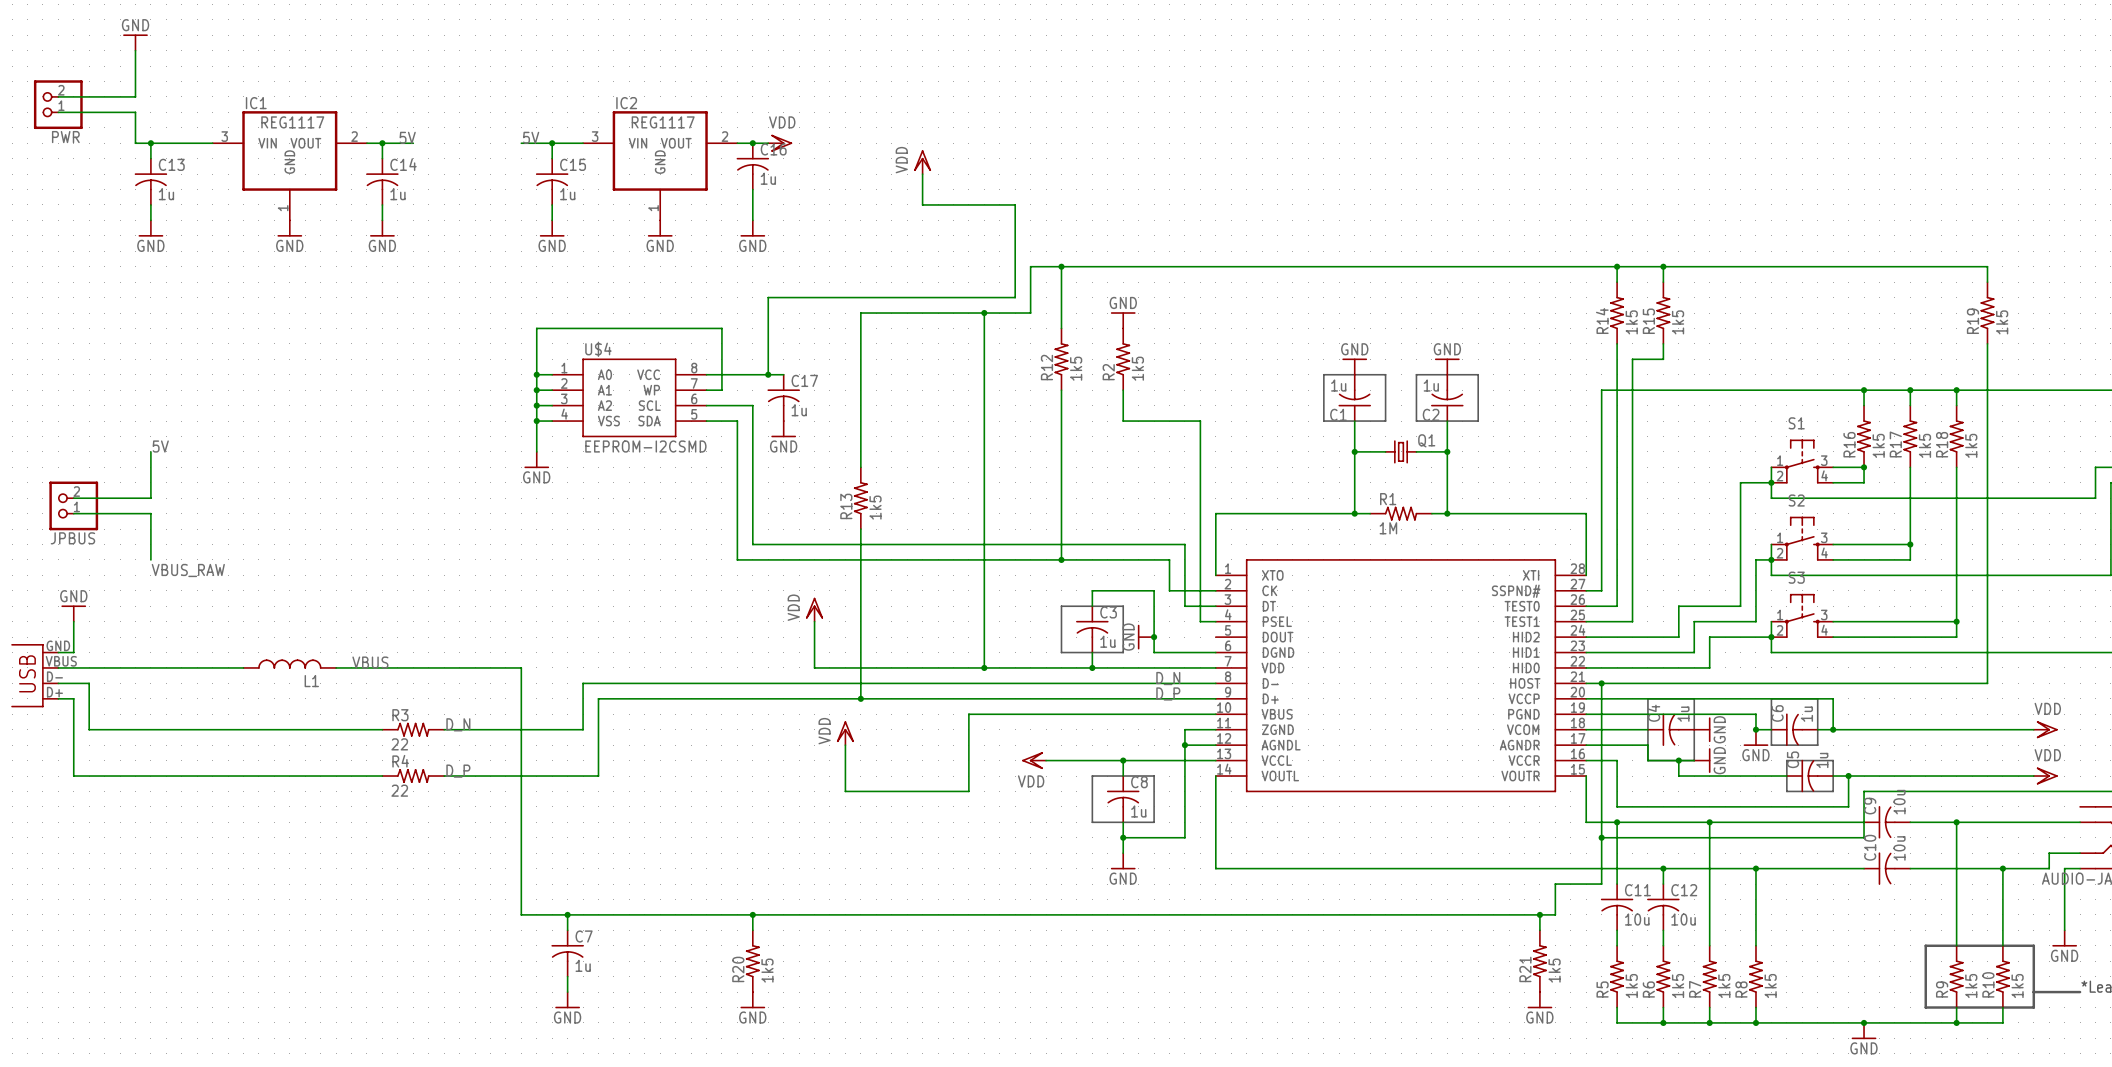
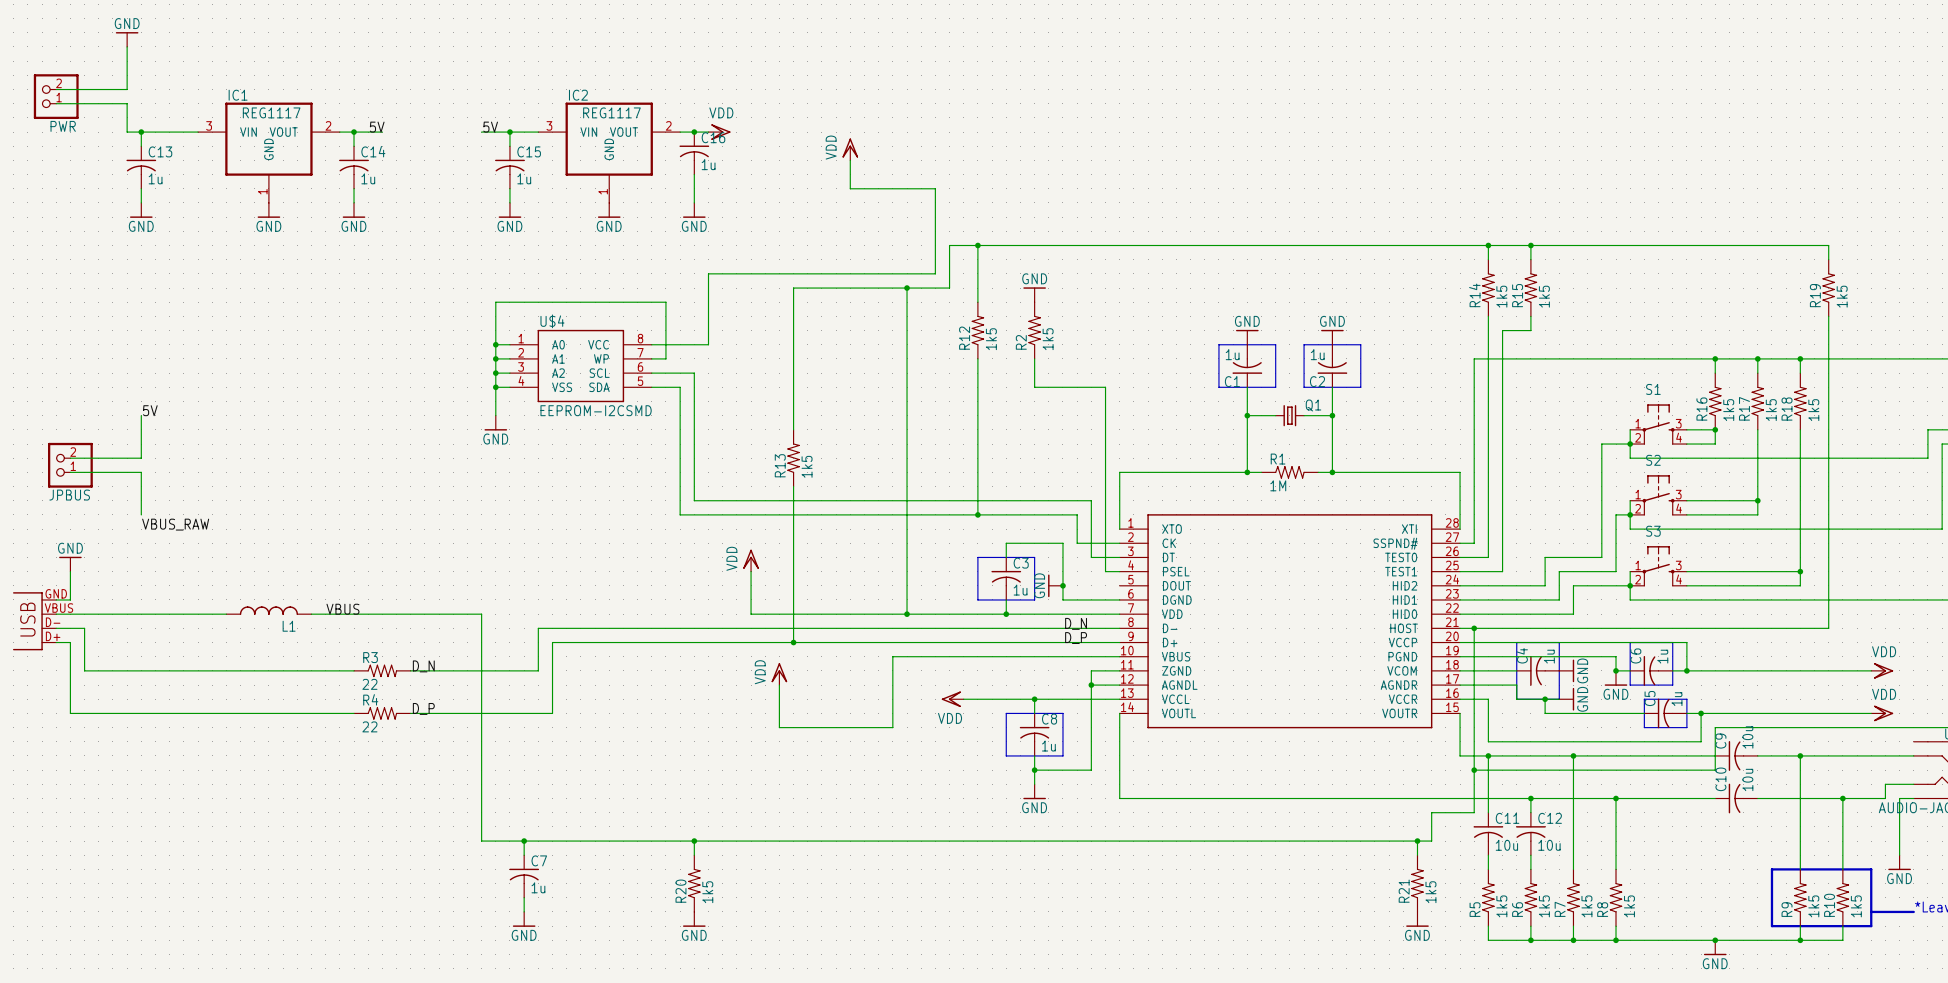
wire: (768, 374) (783, 374) -> none
junction: (768, 374) -> none
C17: 1u (783, 397) -> none
power symbol: GND (783, 429) -> none

